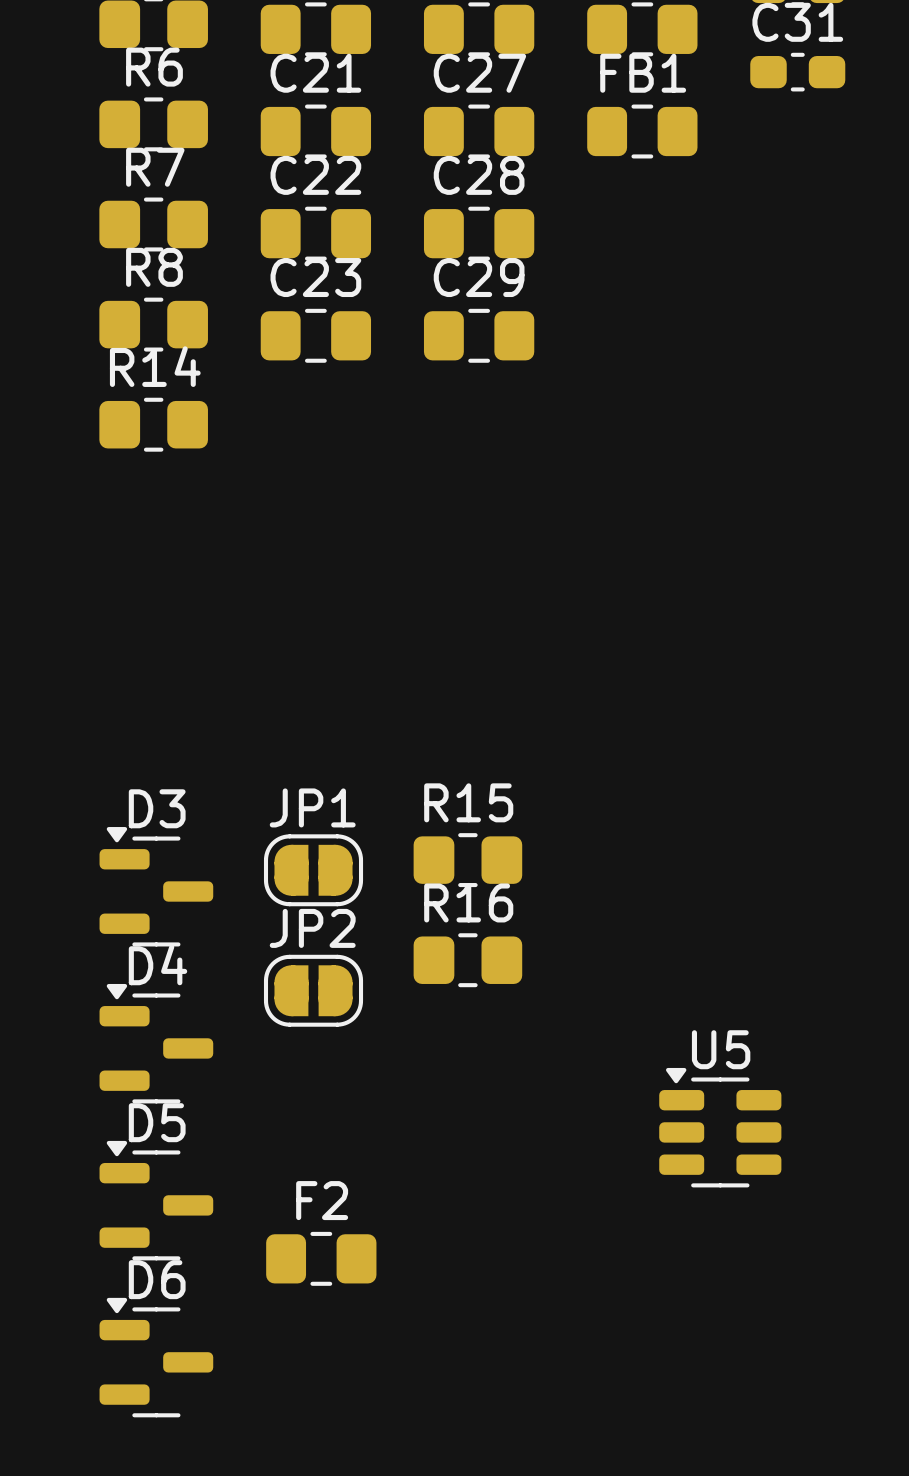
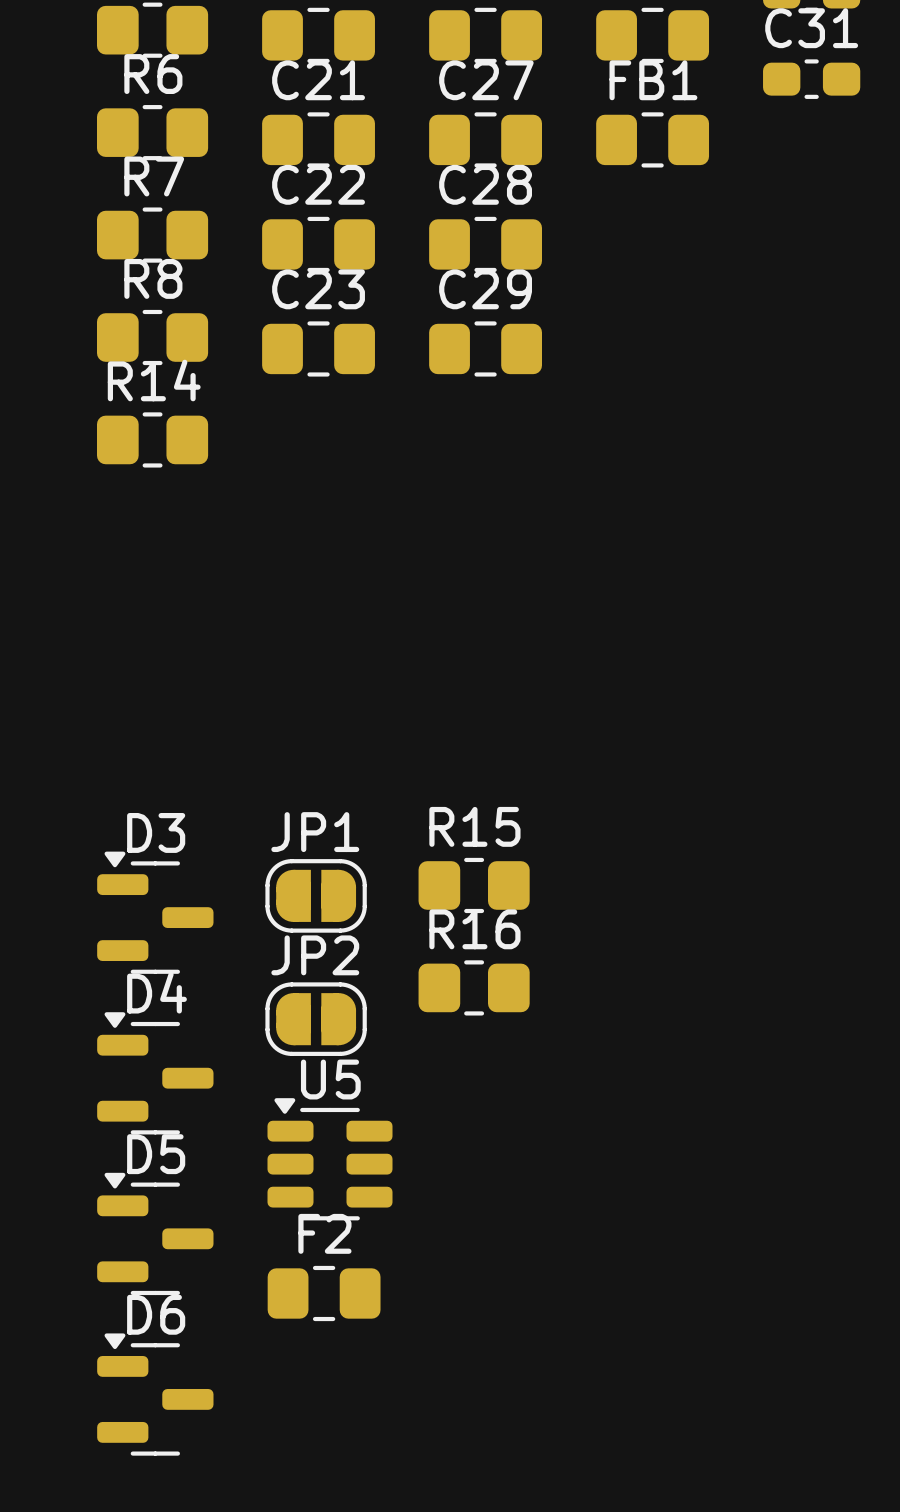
U5 position: (720, 1127) -> (330, 1159)

